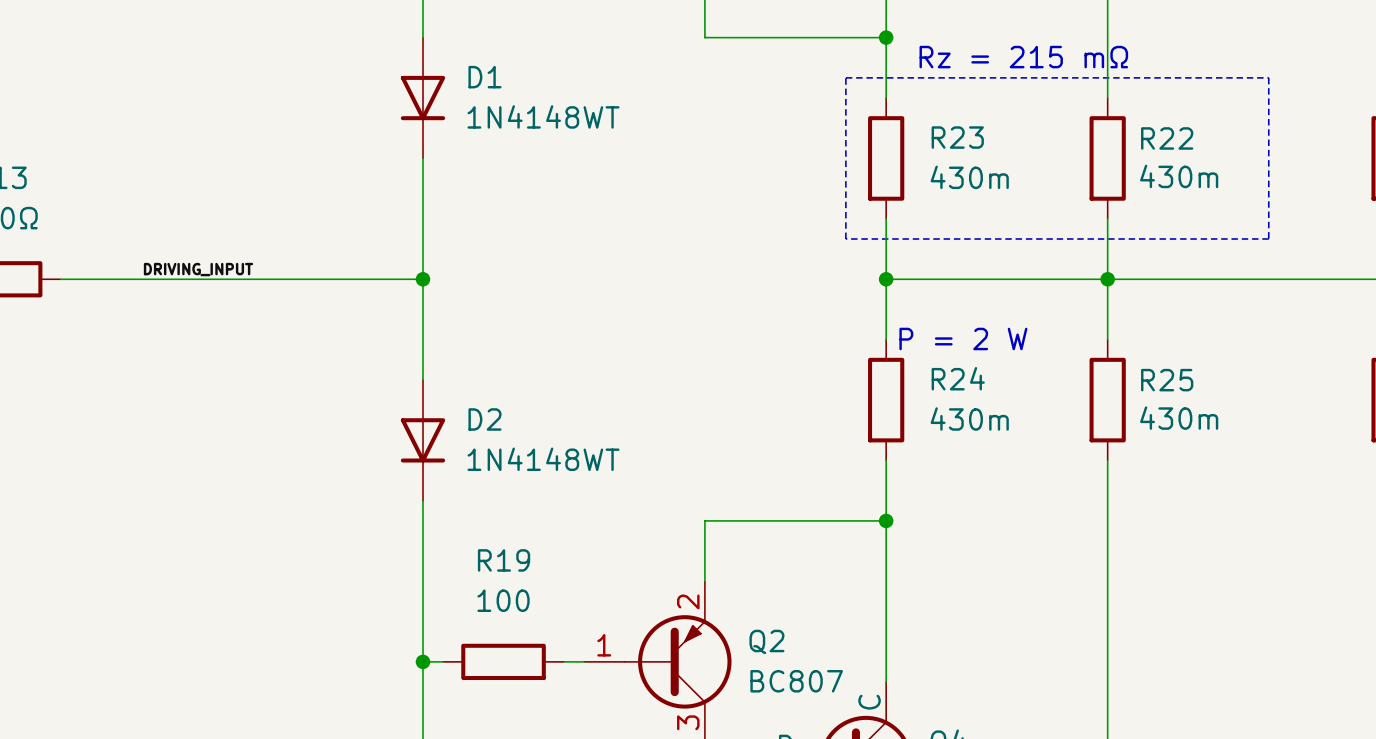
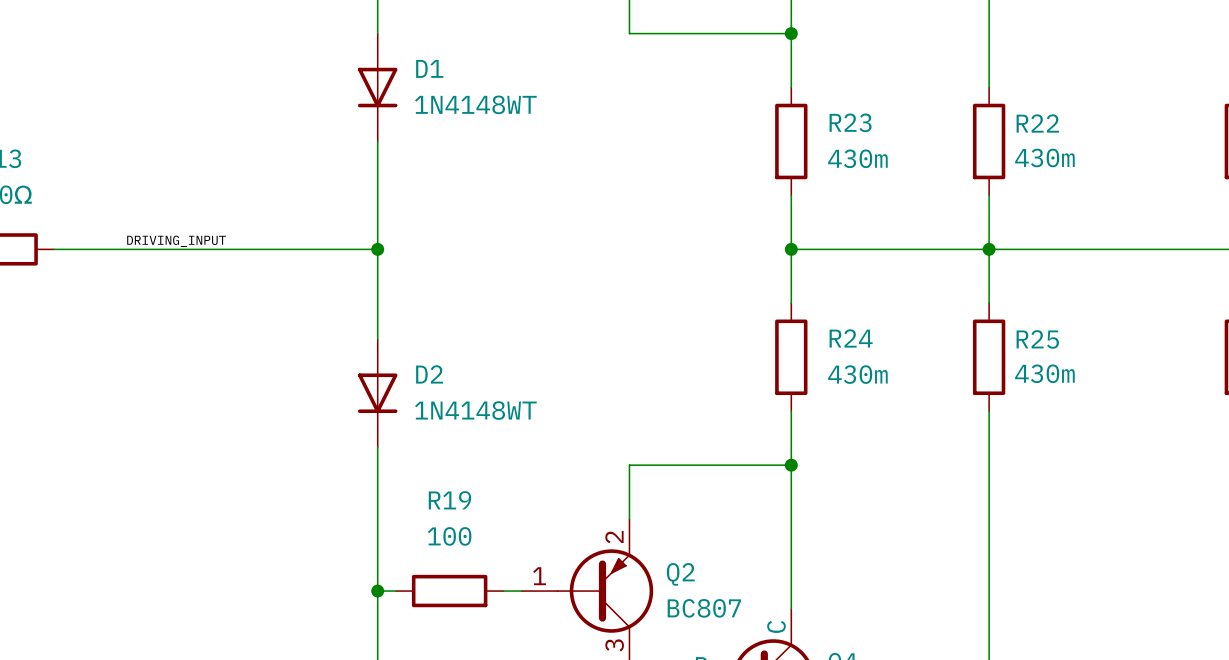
text: Rz = 215 mΩ (1023, 57) -> none
line: (845, 77) (1268, 77) (1268, 239) (845, 239) (845, 77) -> none
text: P = 2 W (963, 339) -> none

